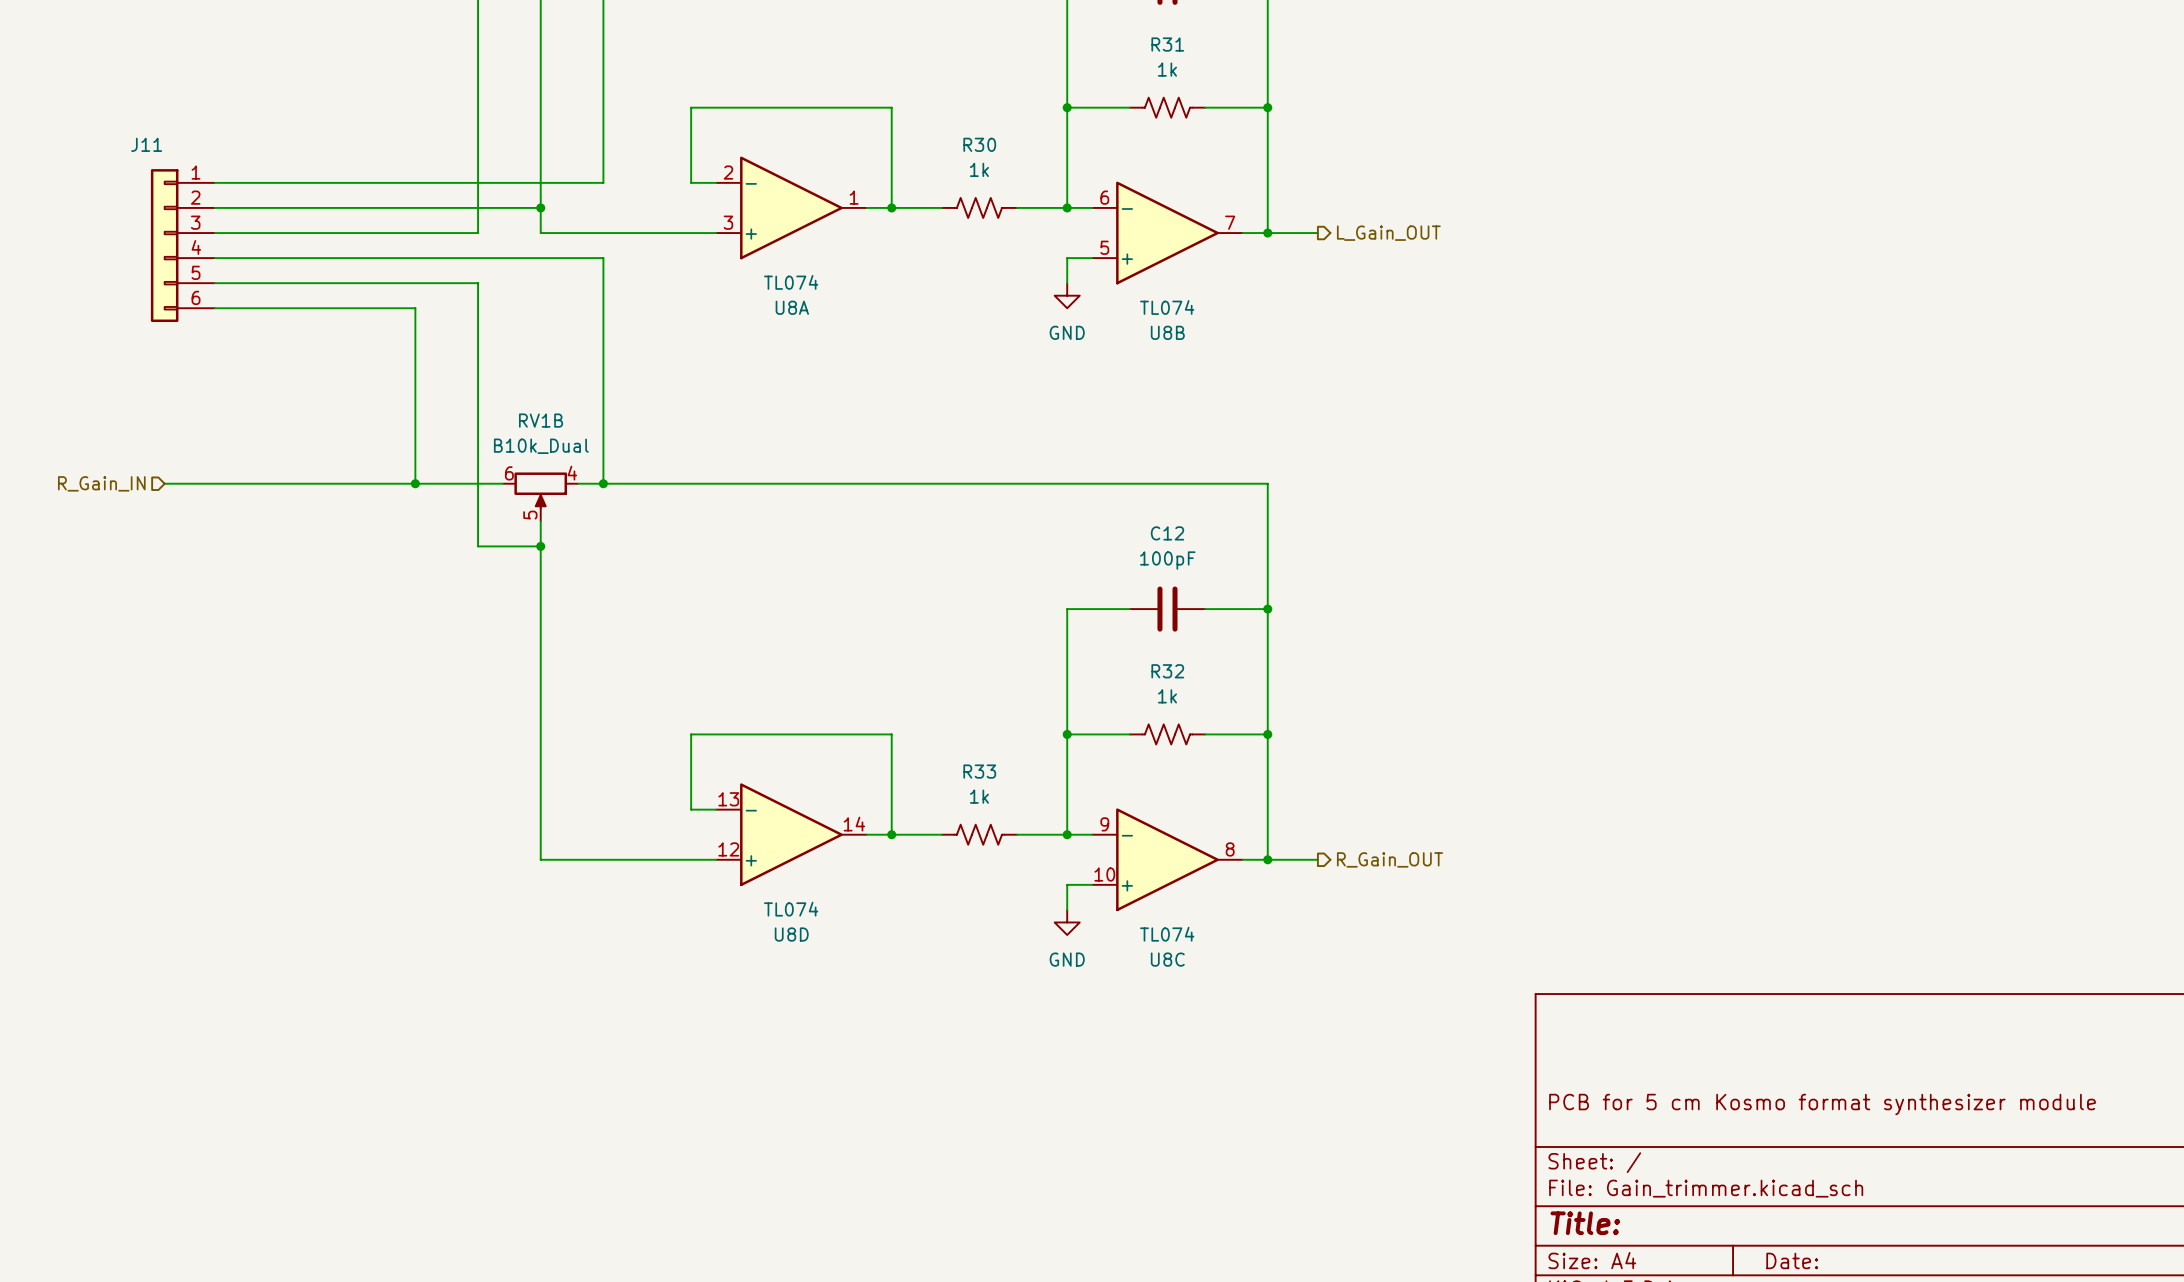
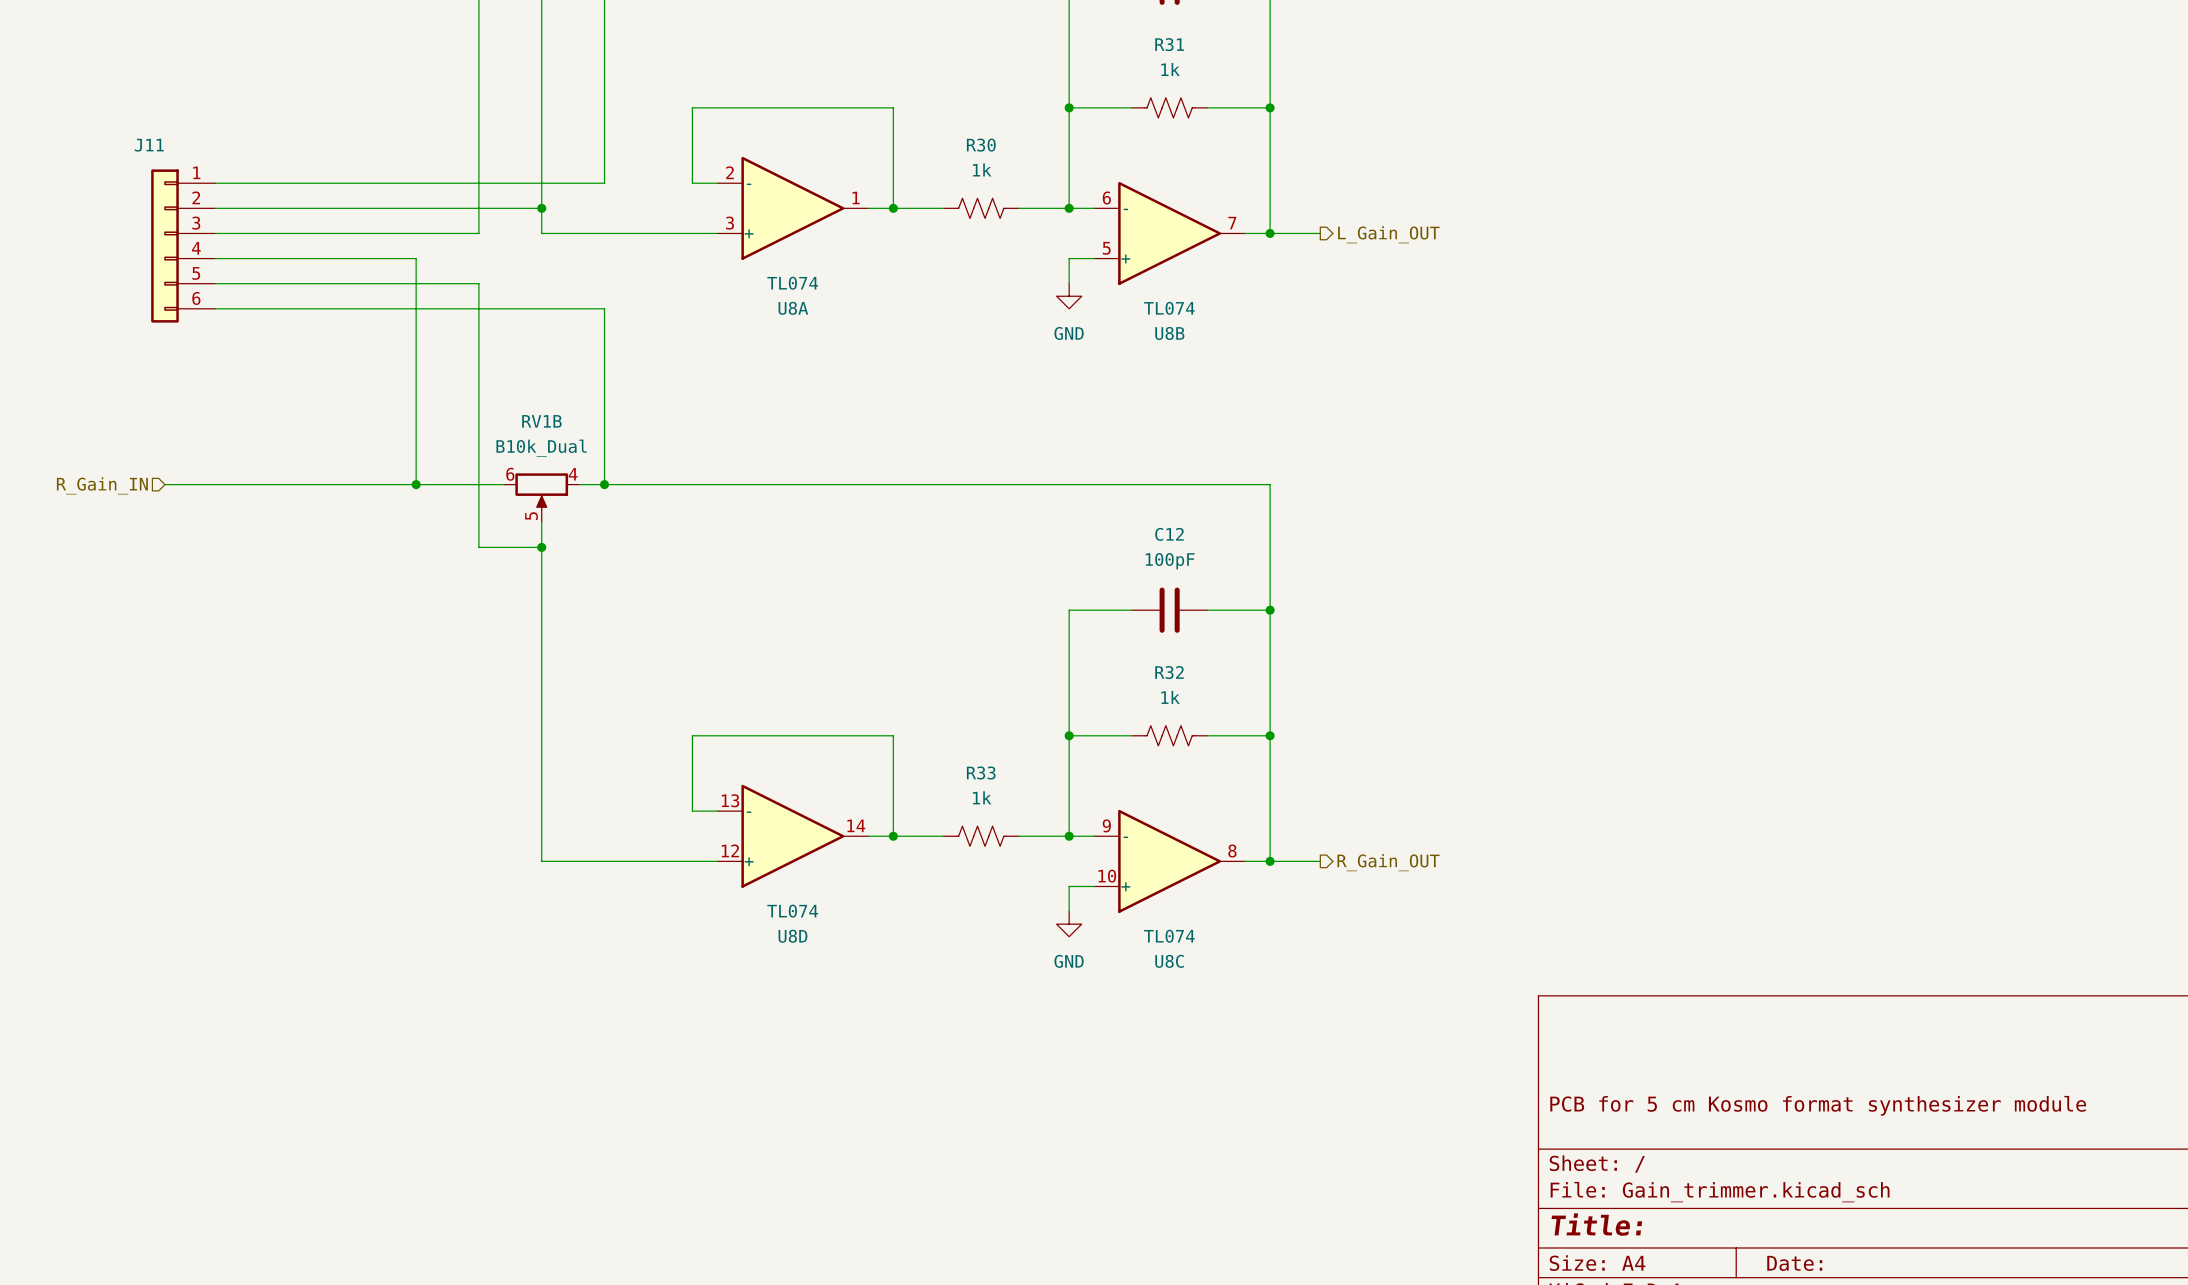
wire: (415, 258) (603, 258) (603, 308) -> (416, 258) (416, 308) (604, 308)

